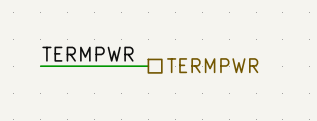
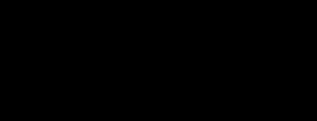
label: TERMPWR (87, 54) -> none
hierarchical label: TERMPWR (212, 65) -> none
wire: (40, 66) (148, 66) -> none

